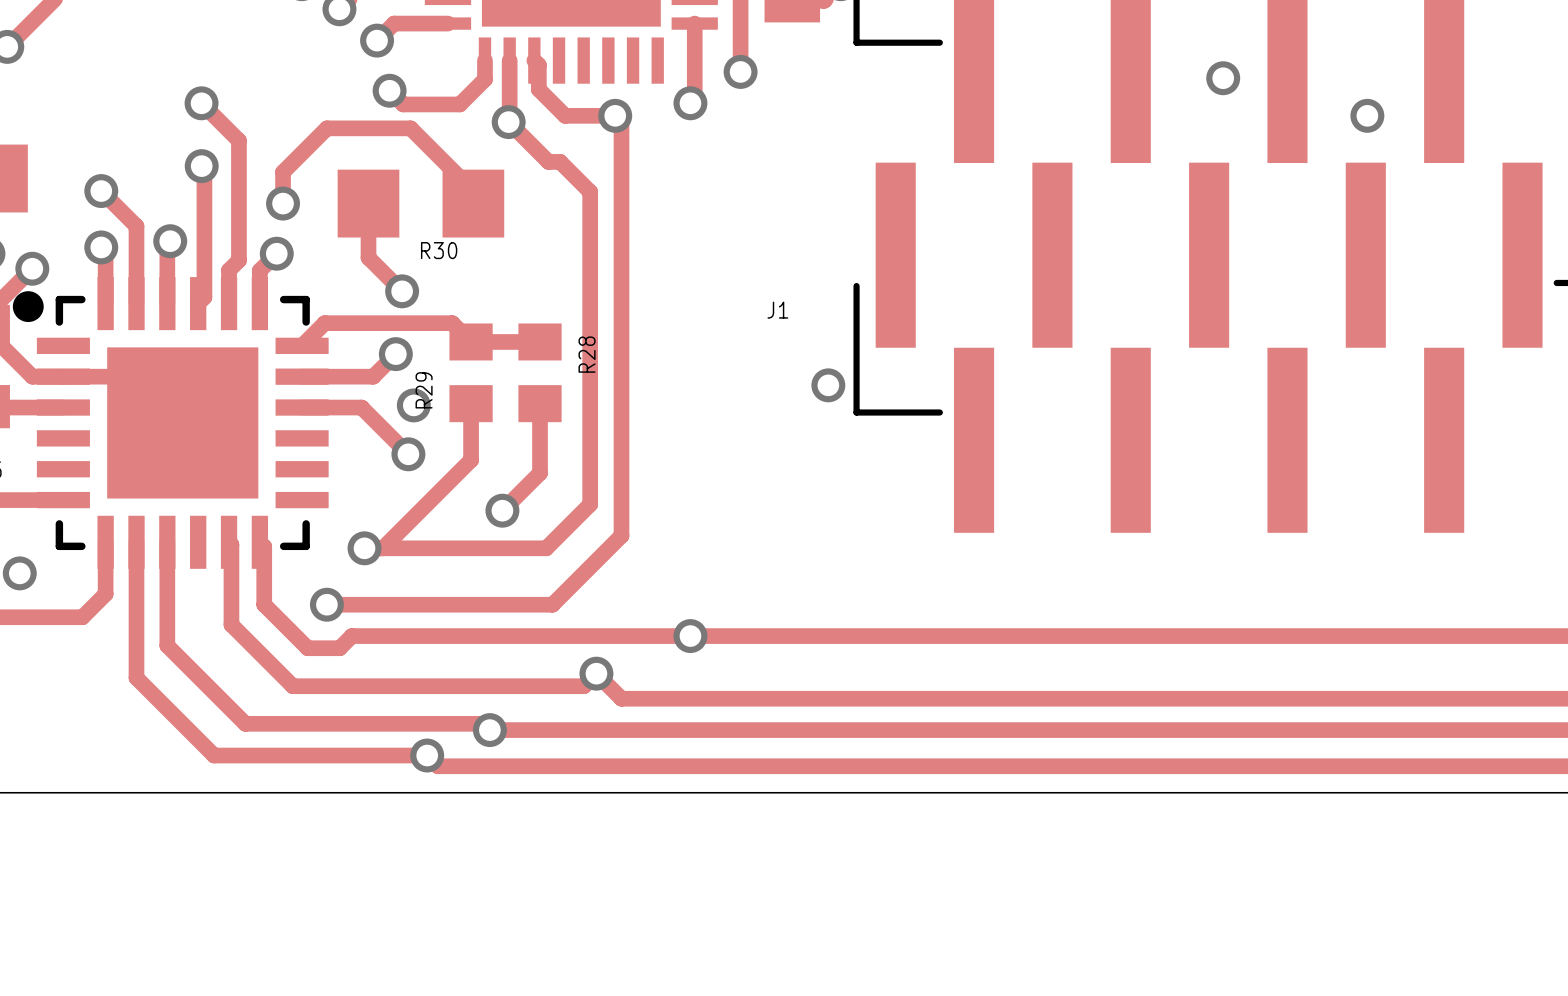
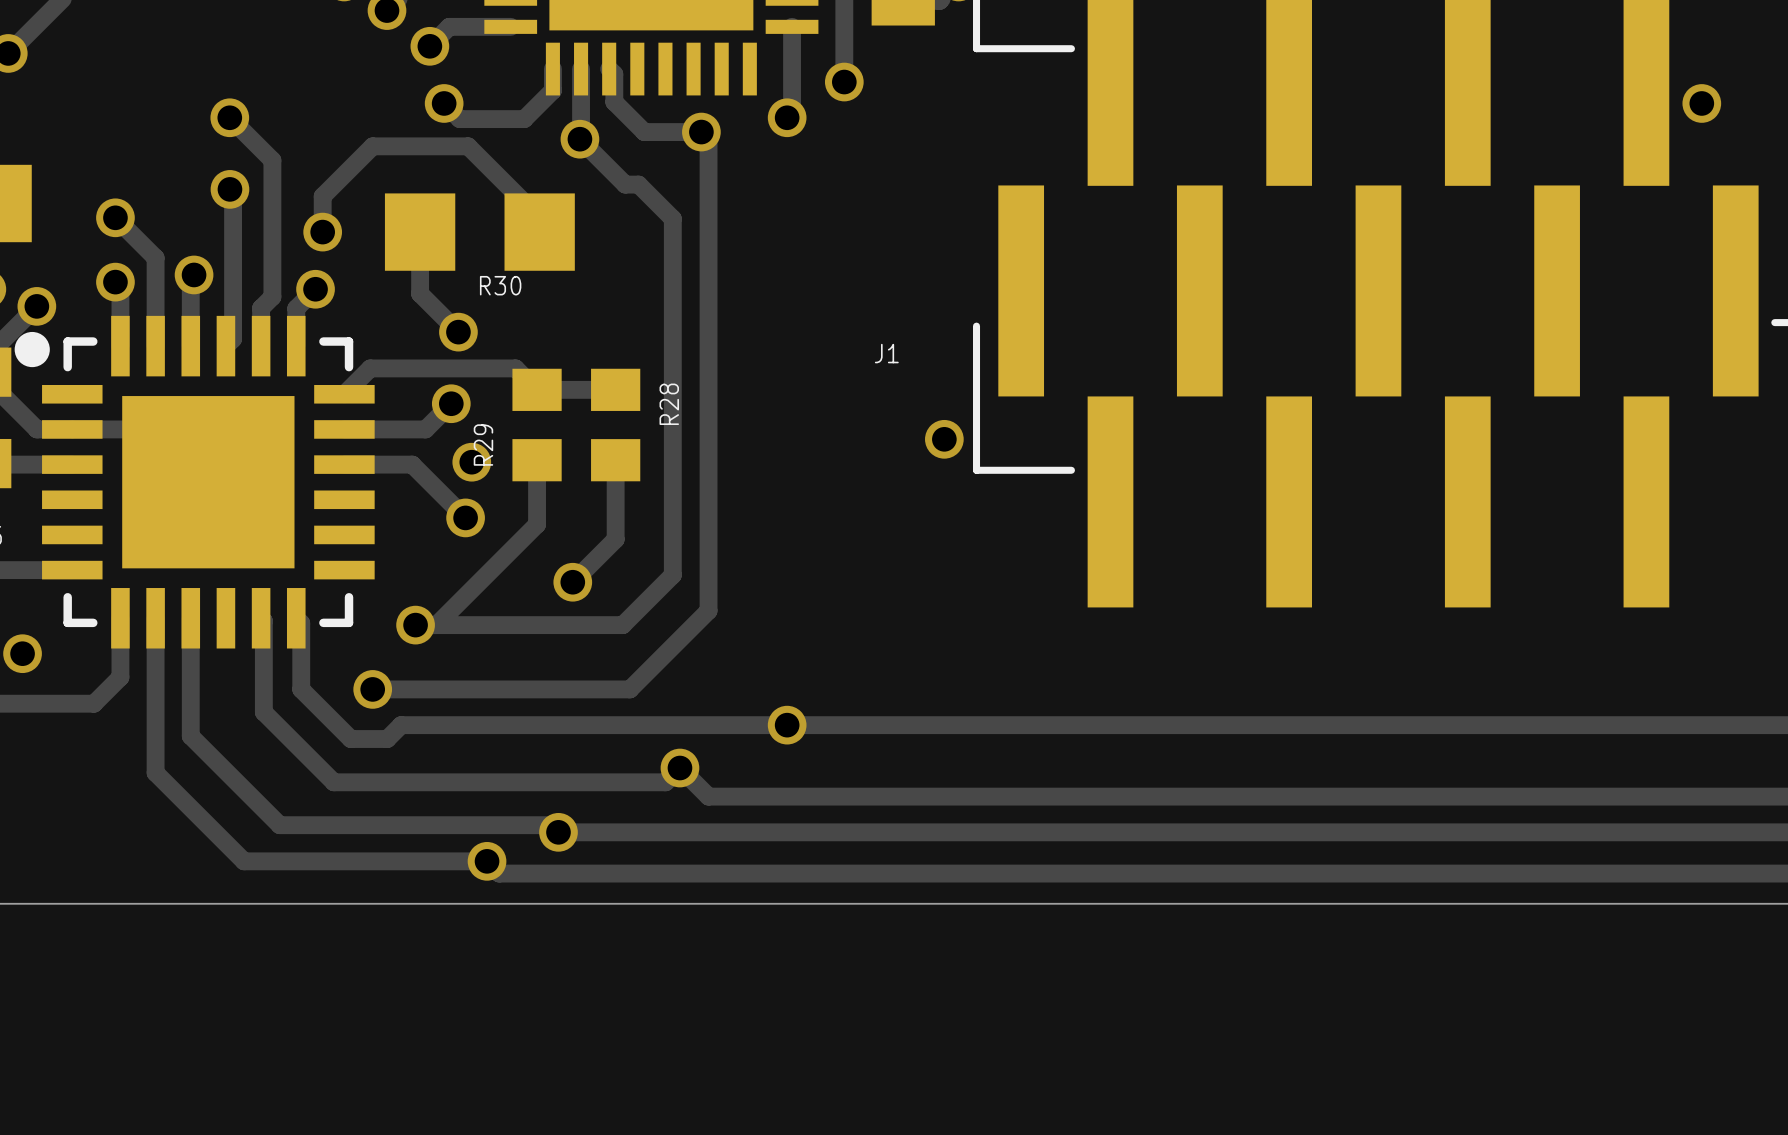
via: (1223, 78) -> none
via: none -> (1701, 103)
via: (1367, 115) -> none

